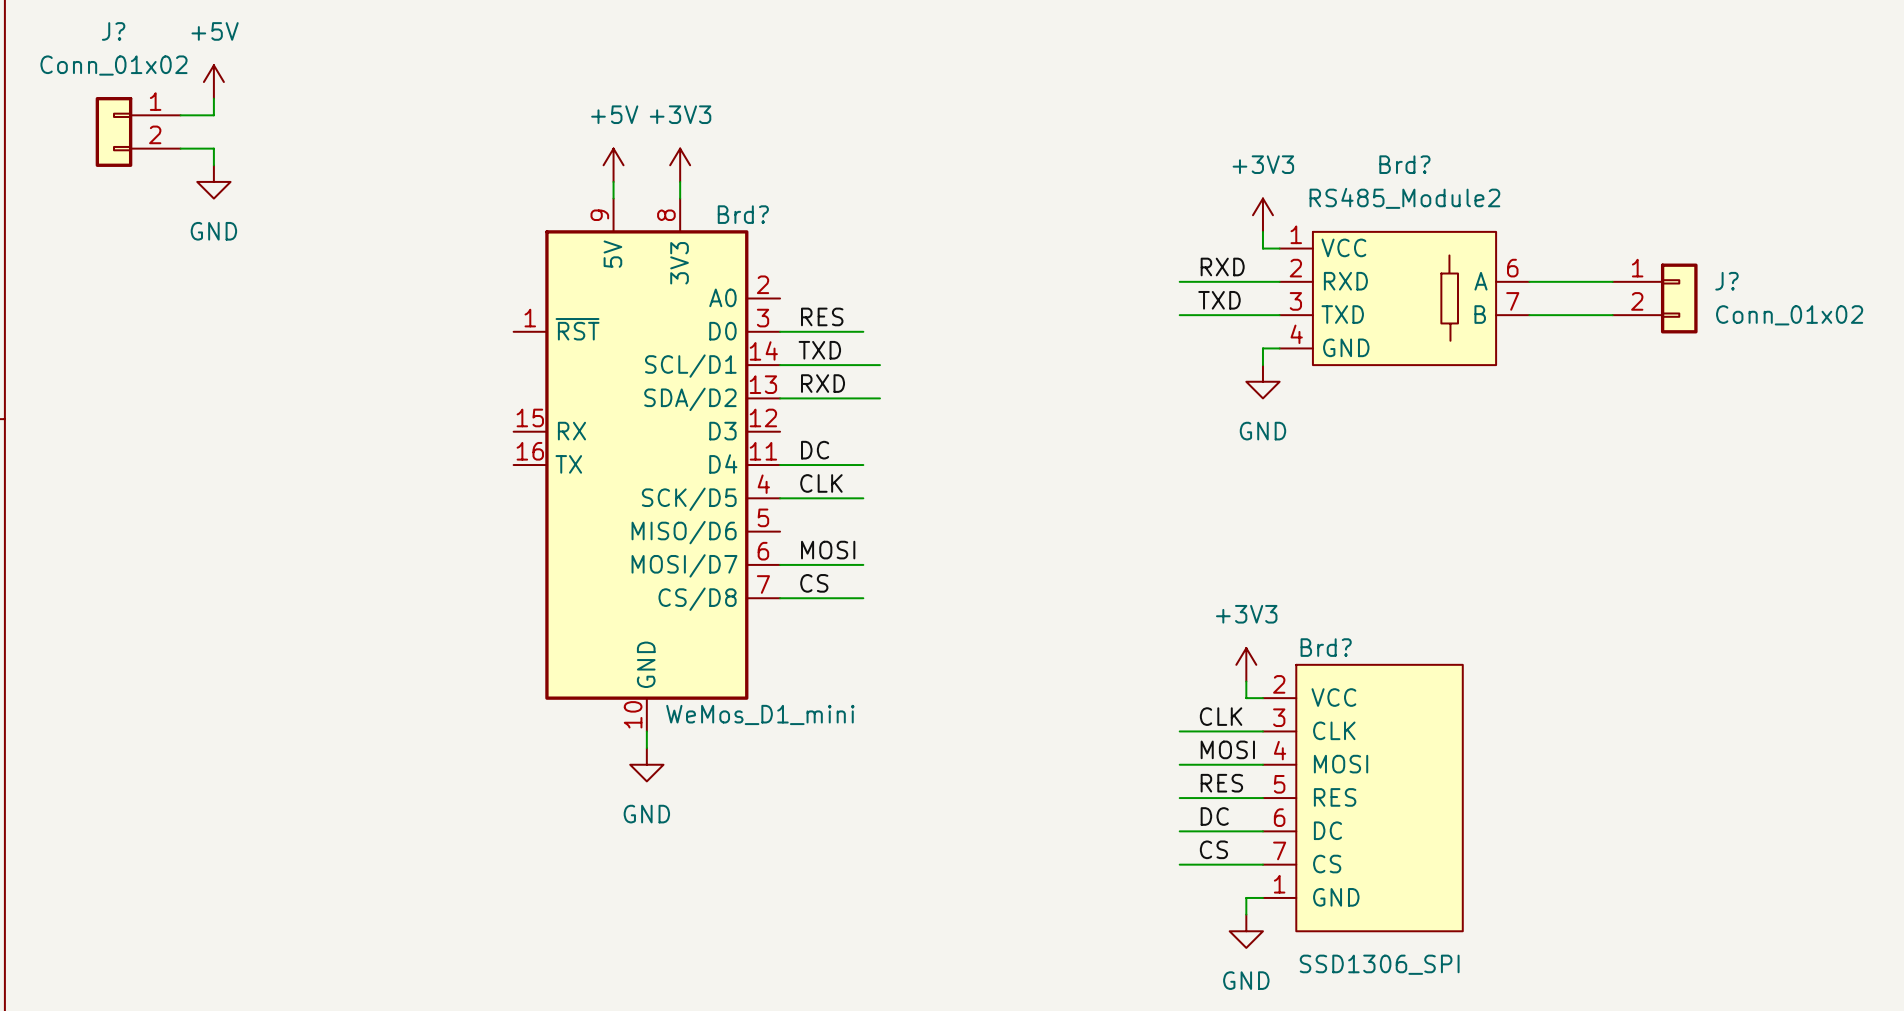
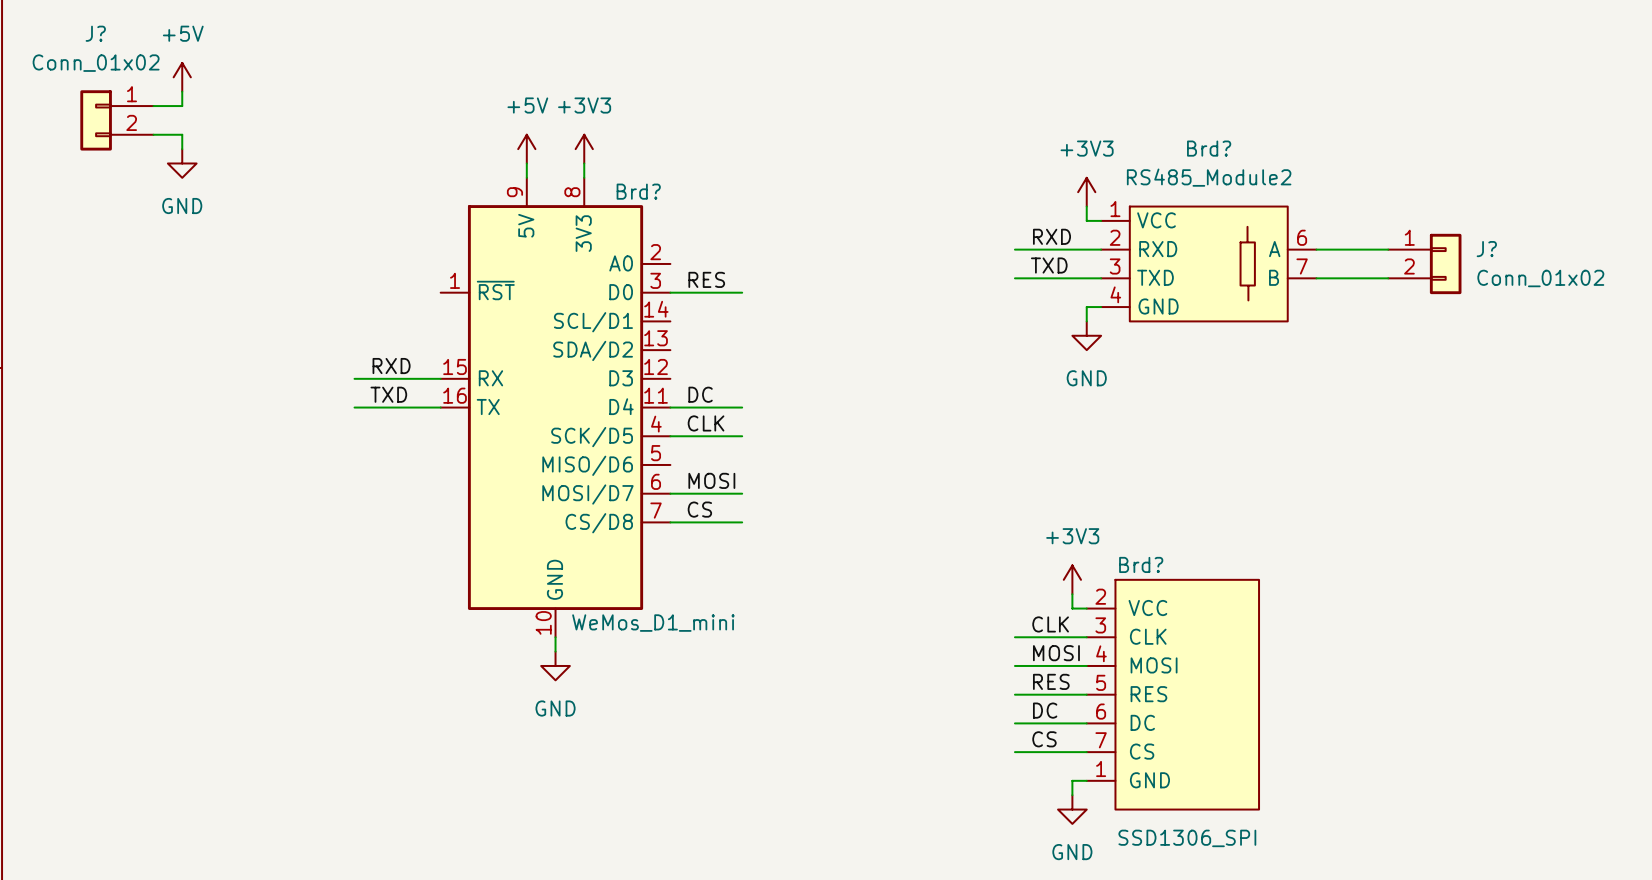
label: TXD (819, 350) -> none
wire: (780, 365) (879, 365) -> none
label: RXD (823, 383) -> none
wire: (780, 398) (879, 398) -> none
label: none -> RXD (391, 366)
wire: none -> (354, 378) (440, 378)
label: none -> TXD (388, 394)
wire: none -> (354, 407) (440, 407)

